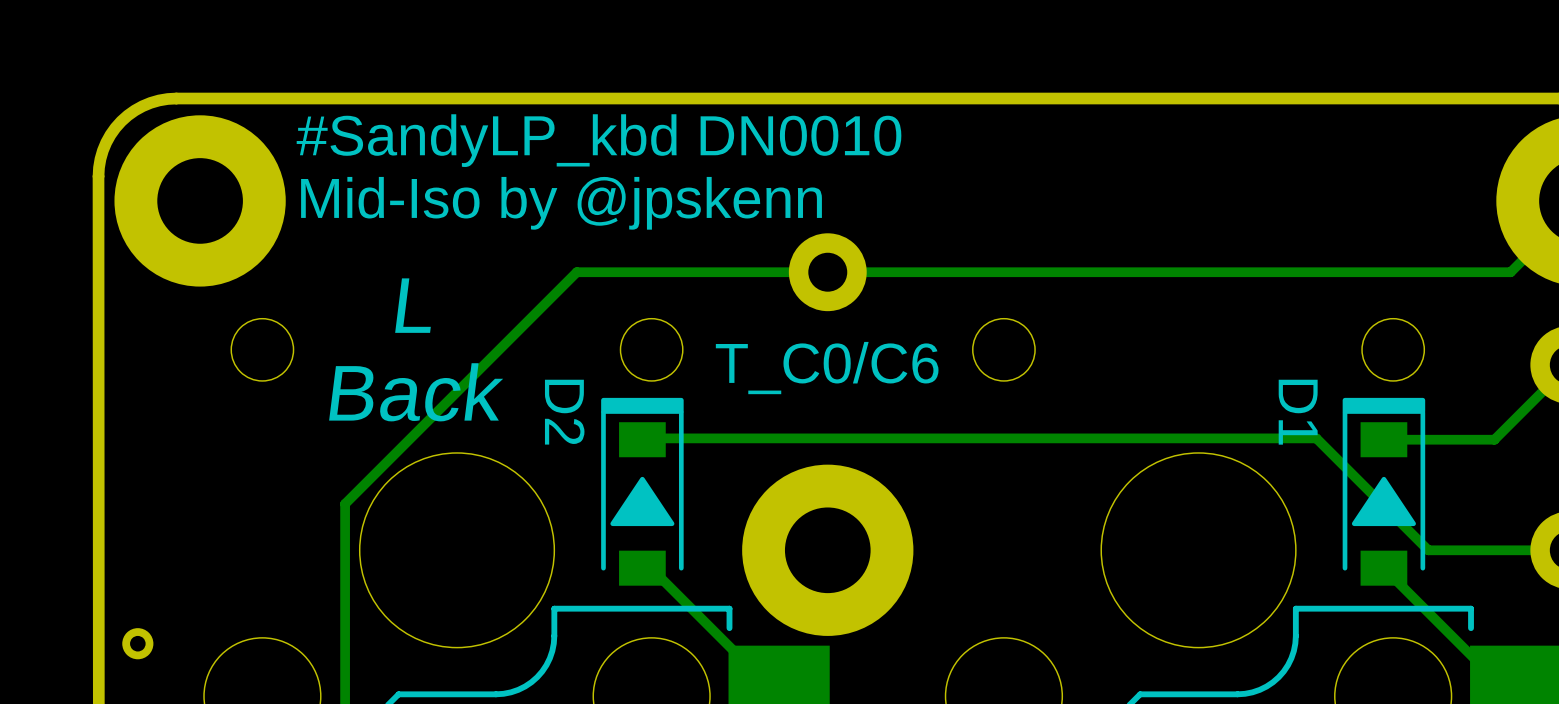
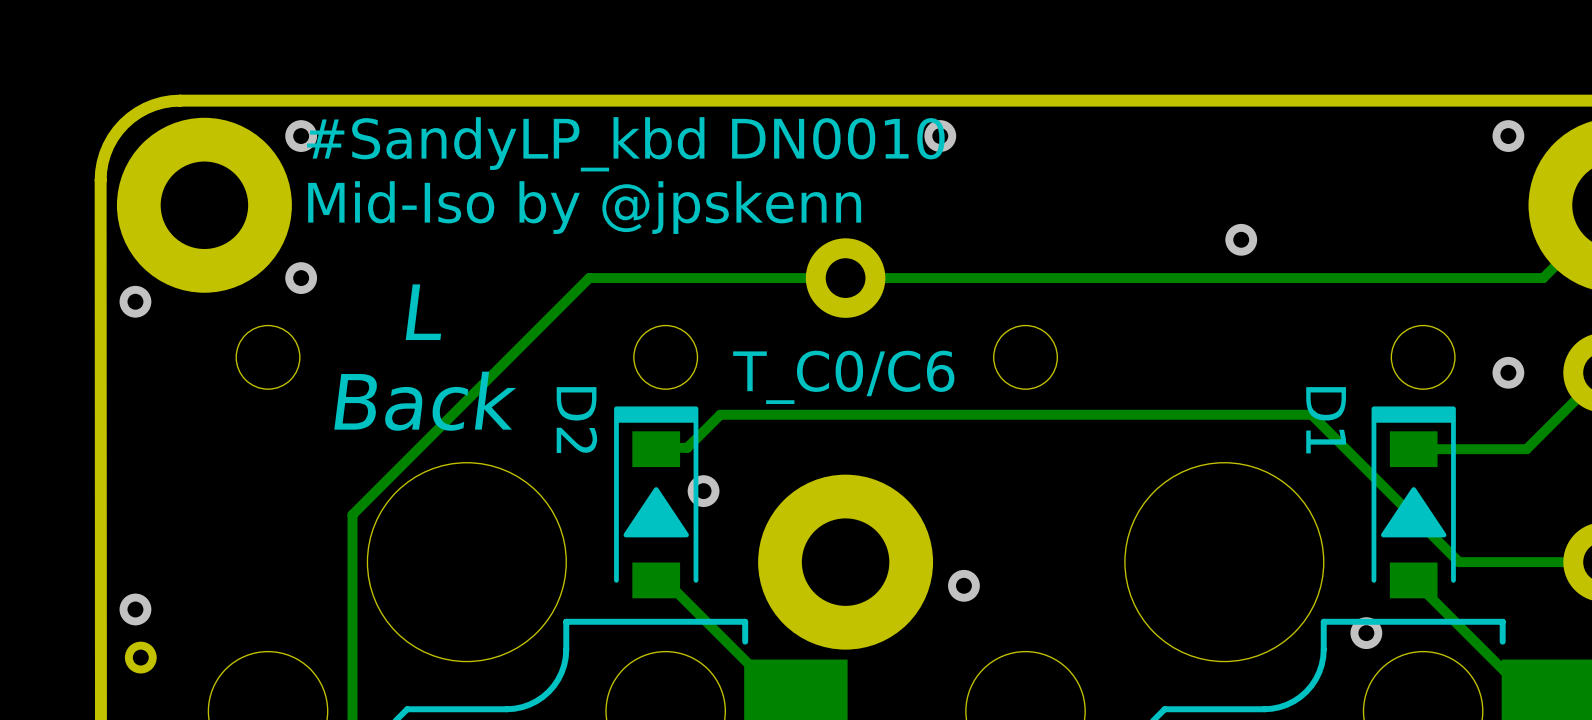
via: none -> (301, 136)
via: none -> (940, 136)
via: none -> (1508, 136)
via: none -> (1241, 239)
via: none -> (301, 278)
via: none -> (135, 301)
via: none -> (1508, 372)
track: (1316, 438) (672, 438) -> (1344, 447) (1311, 414) (720, 414) (687, 447)
via: none -> (703, 491)
via: none -> (963, 585)
via: none -> (135, 609)
via: none -> (1366, 633)

